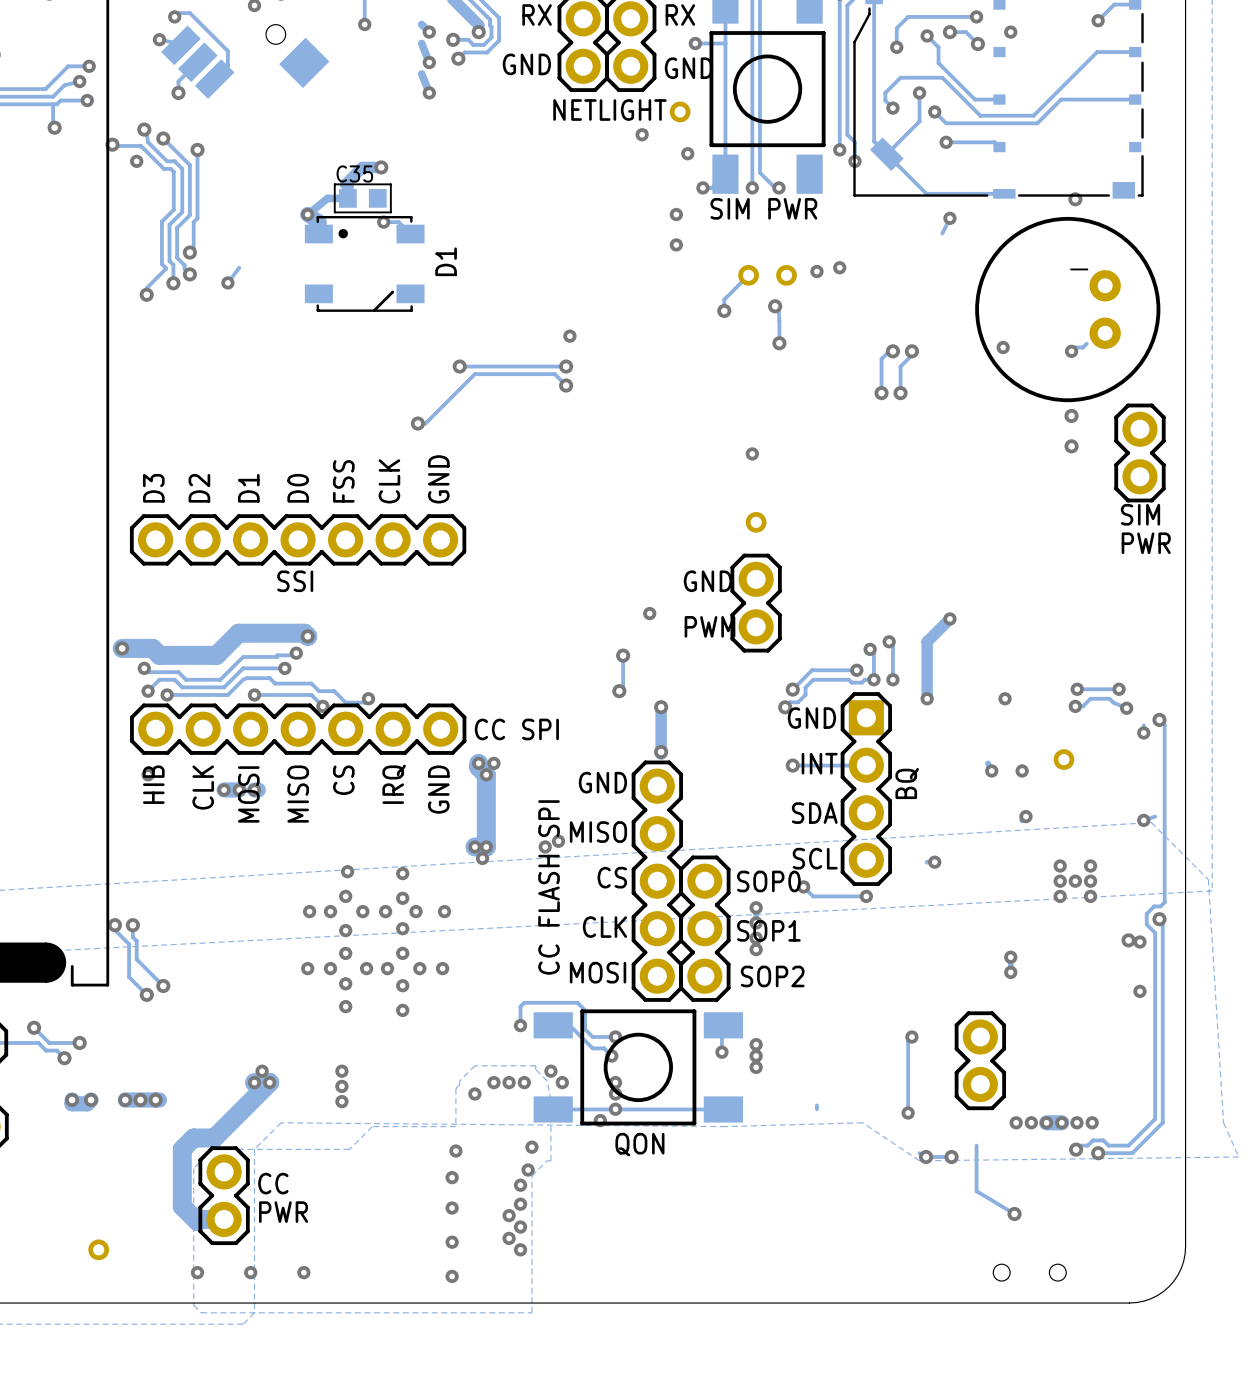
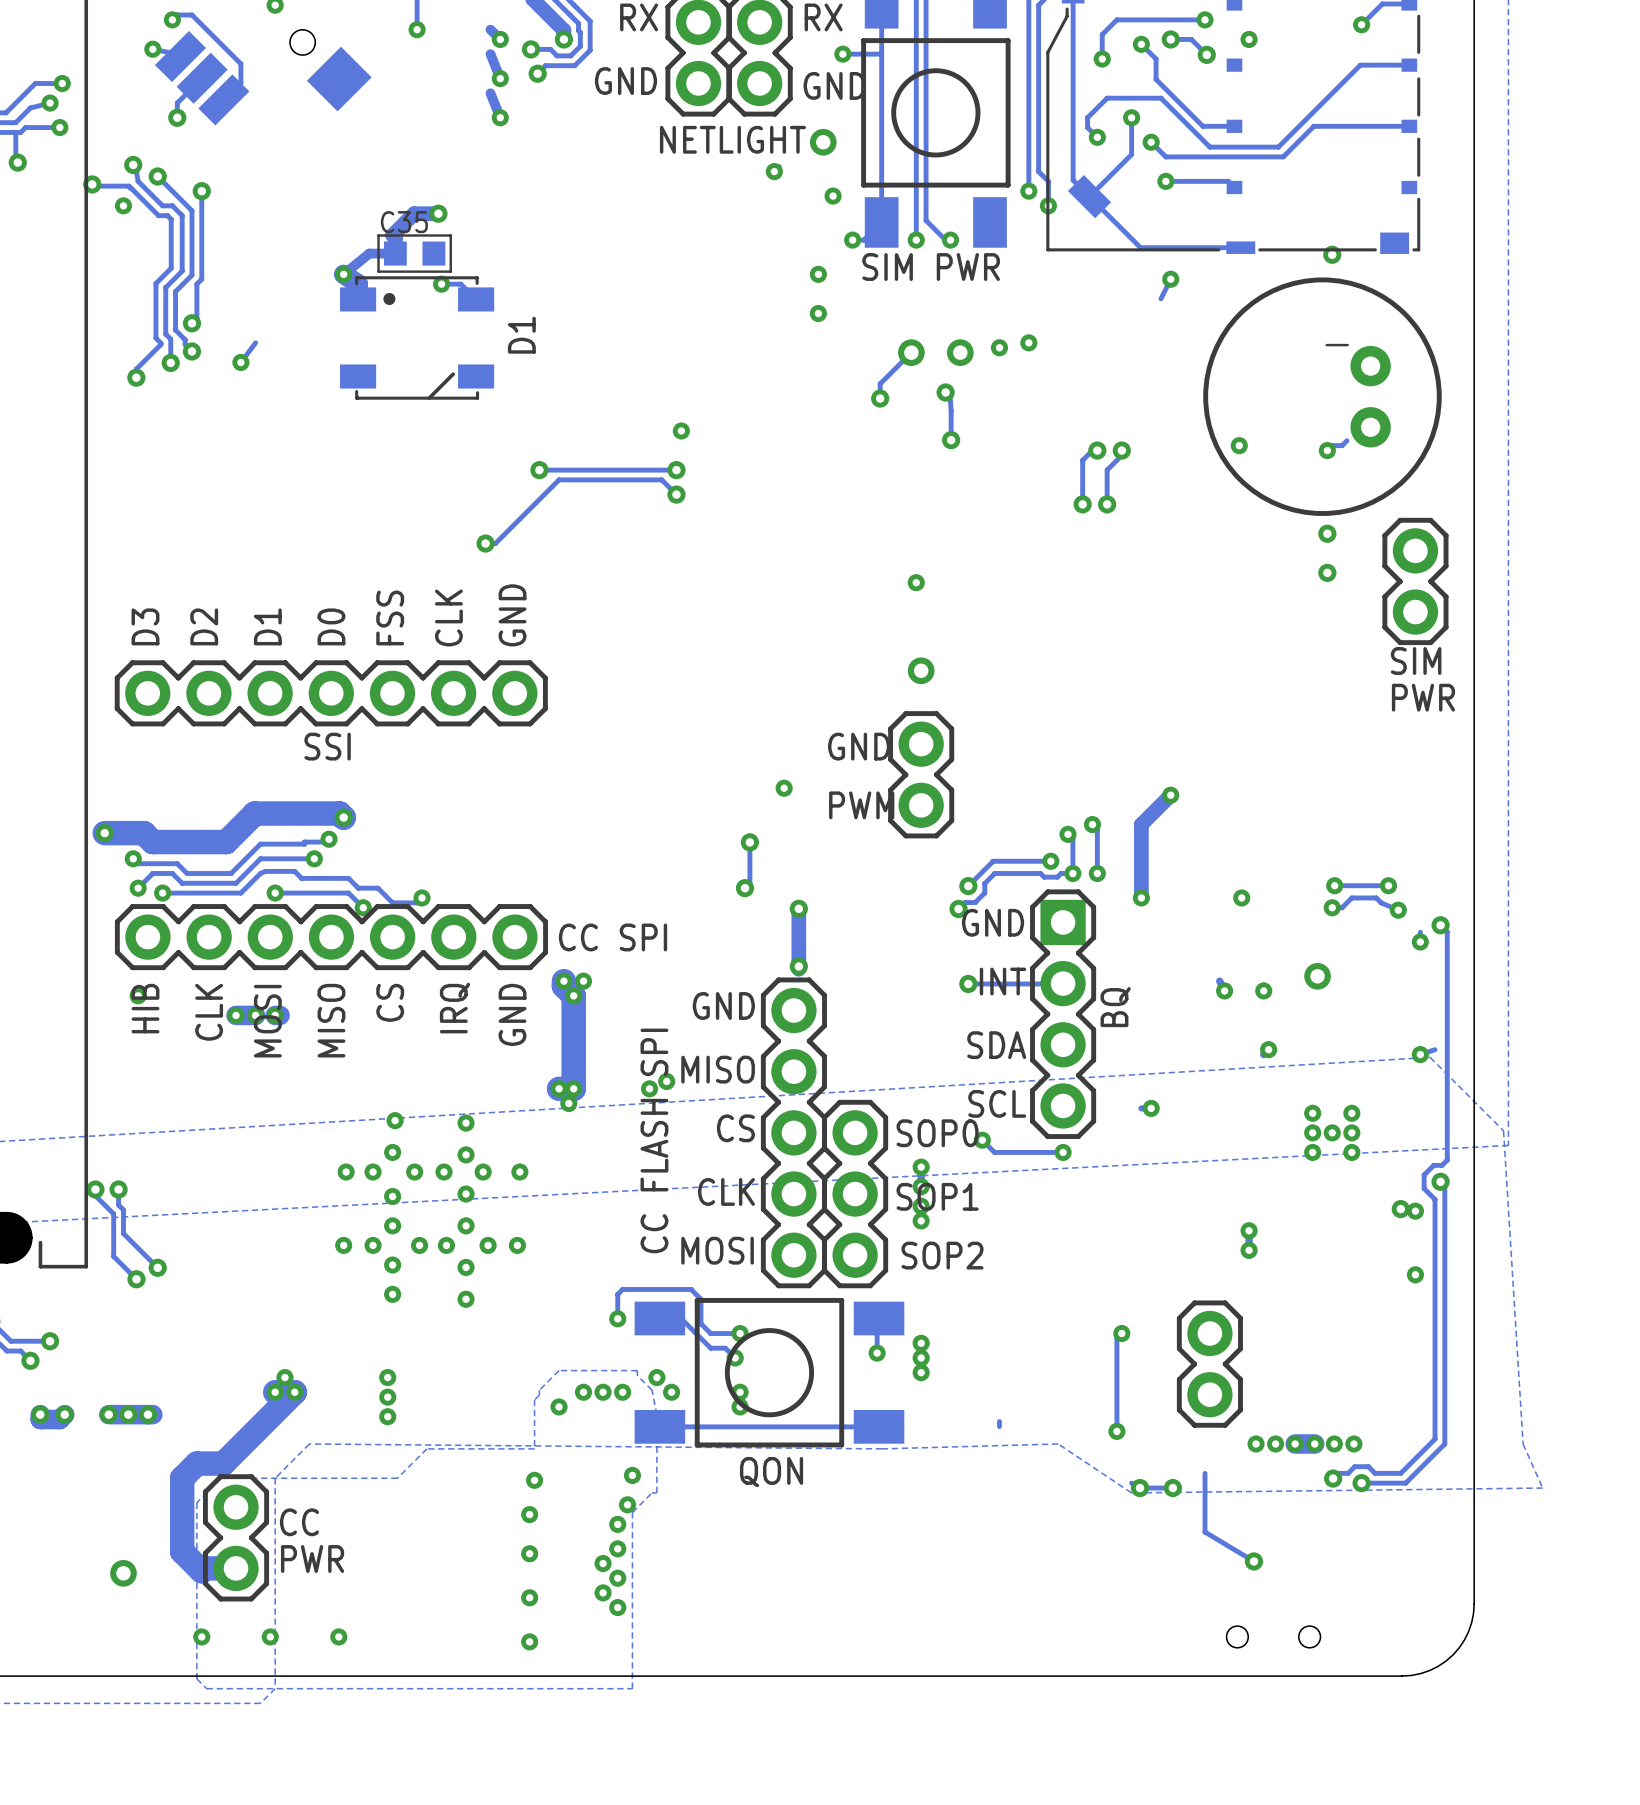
via: (615, 1109) -> none
via: (600, 1120) -> none
part position: (98, 1249) -> (123, 1573)

